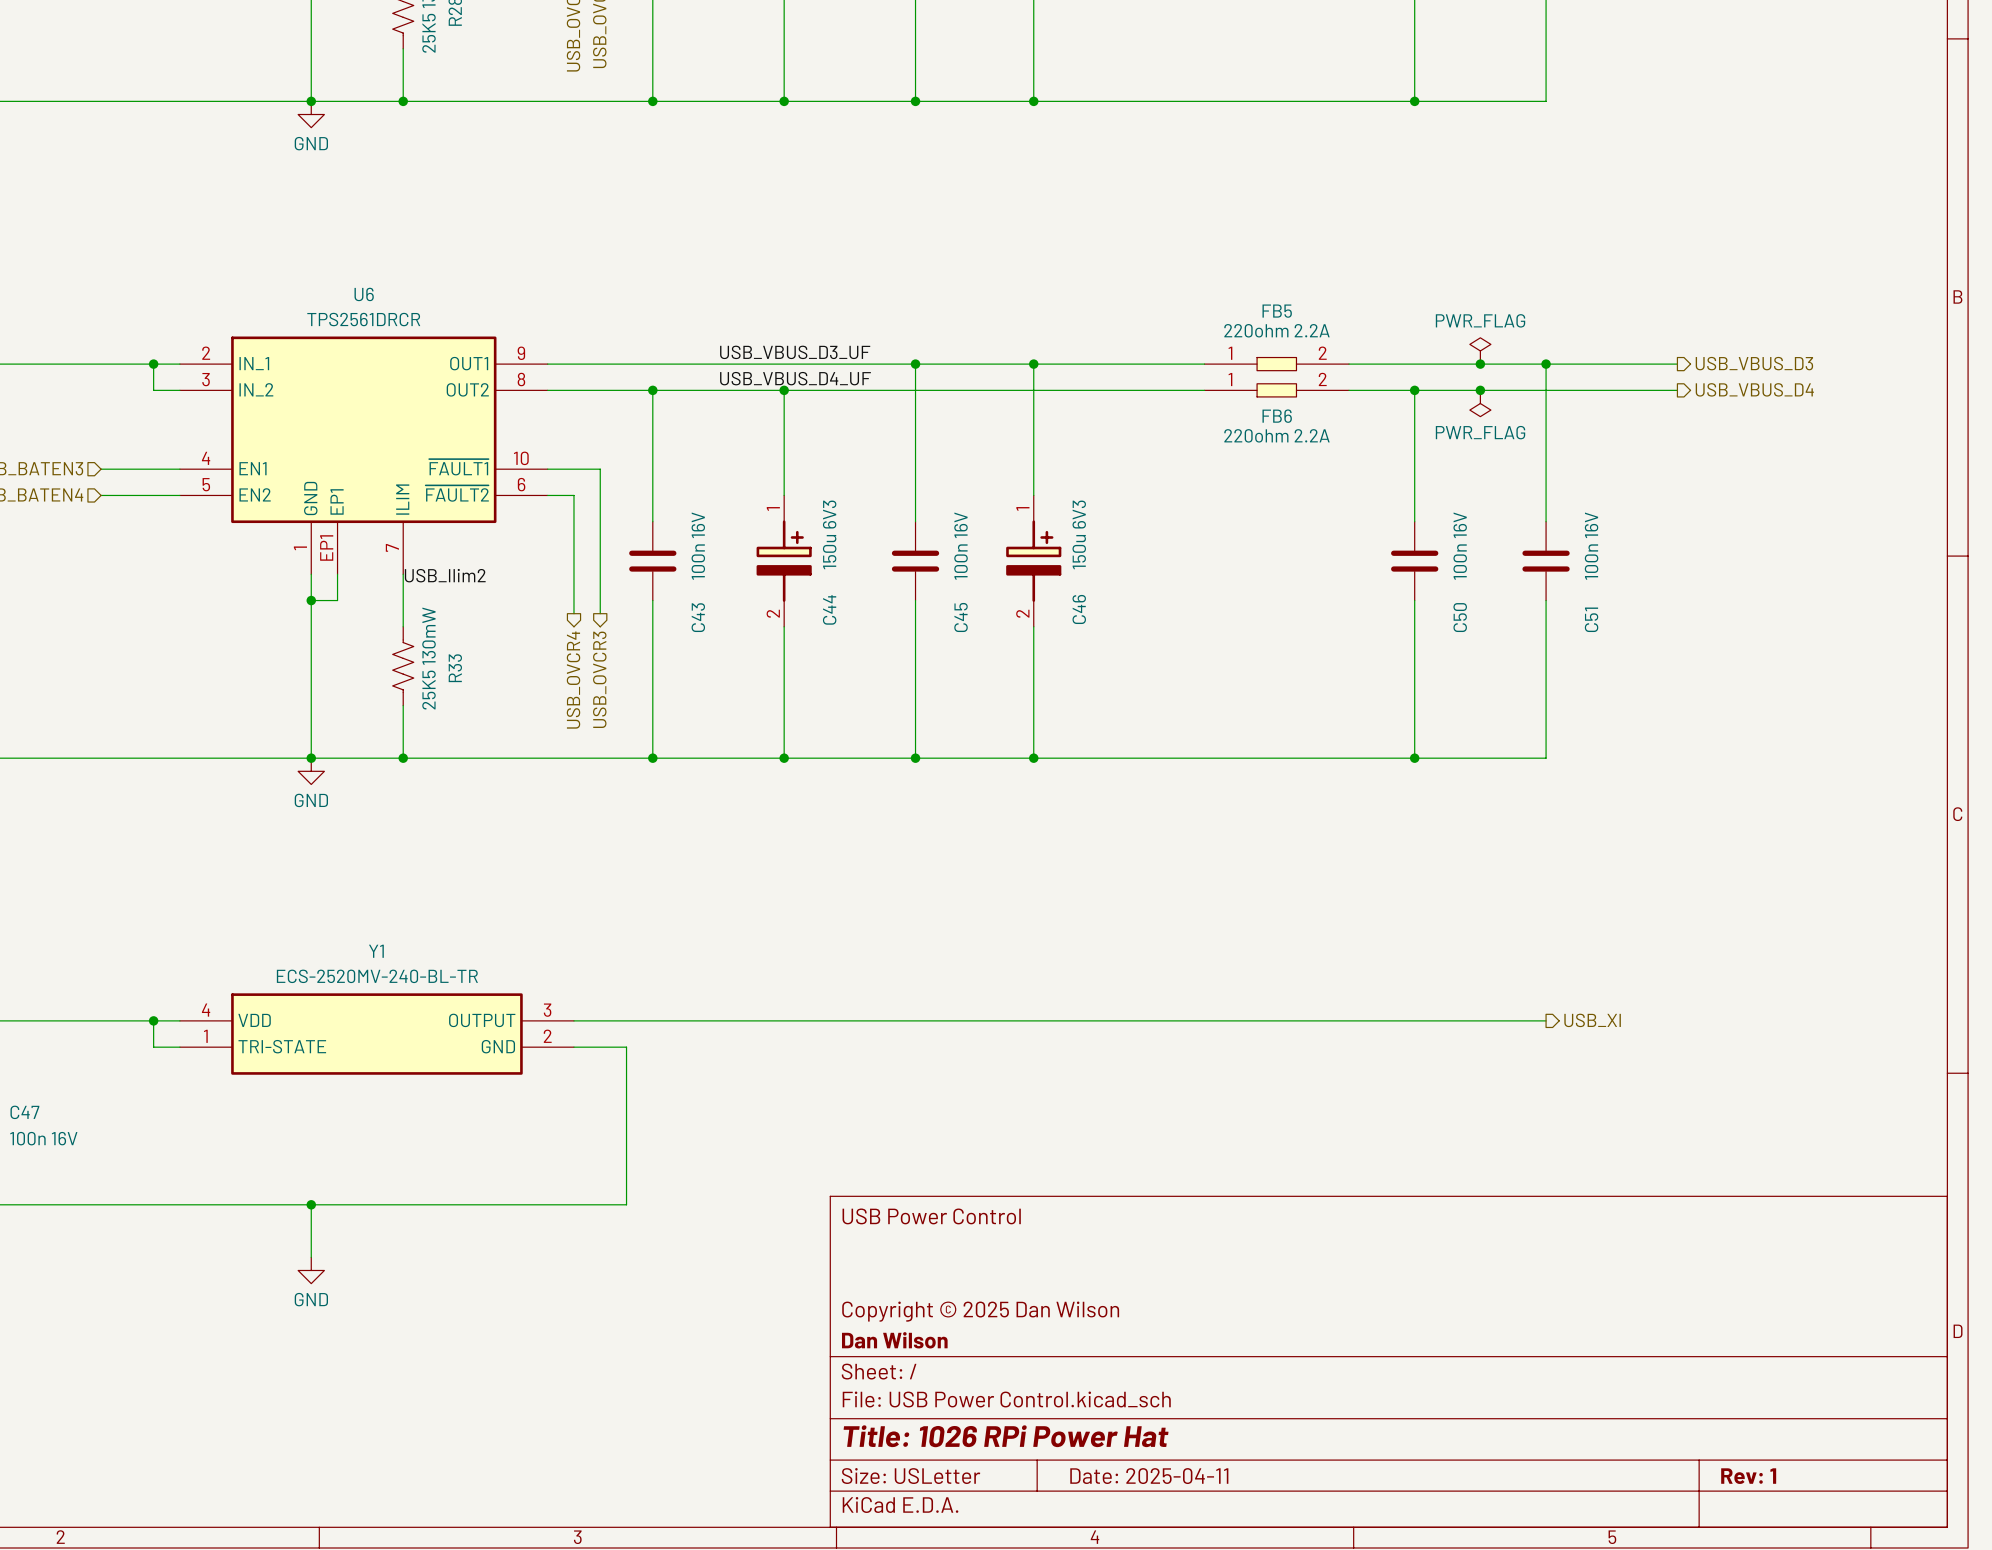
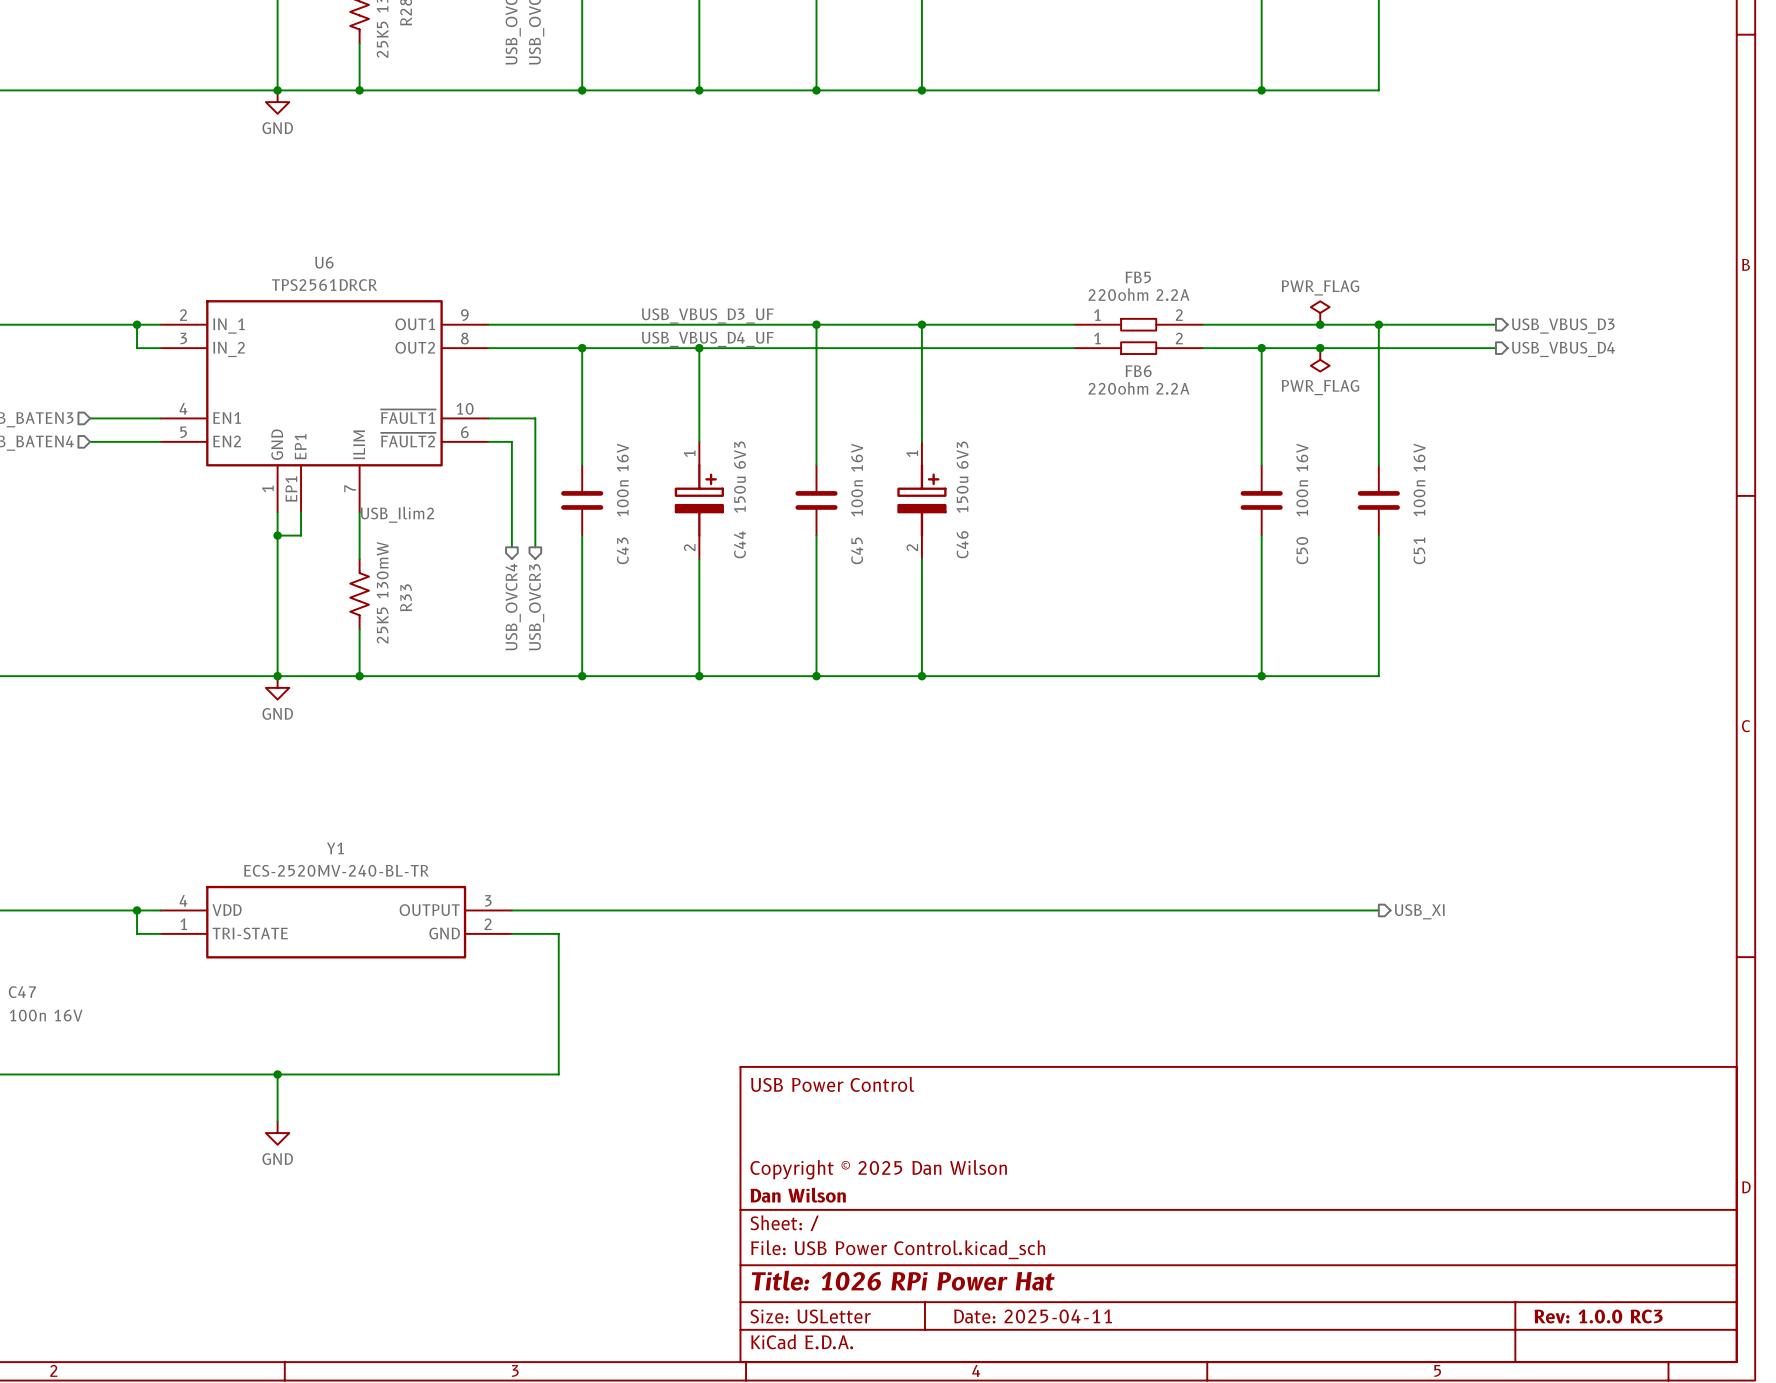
title block: Rev: 1 (1748, 1476) -> Rev: 1.0.0 RC3 (1598, 1316)

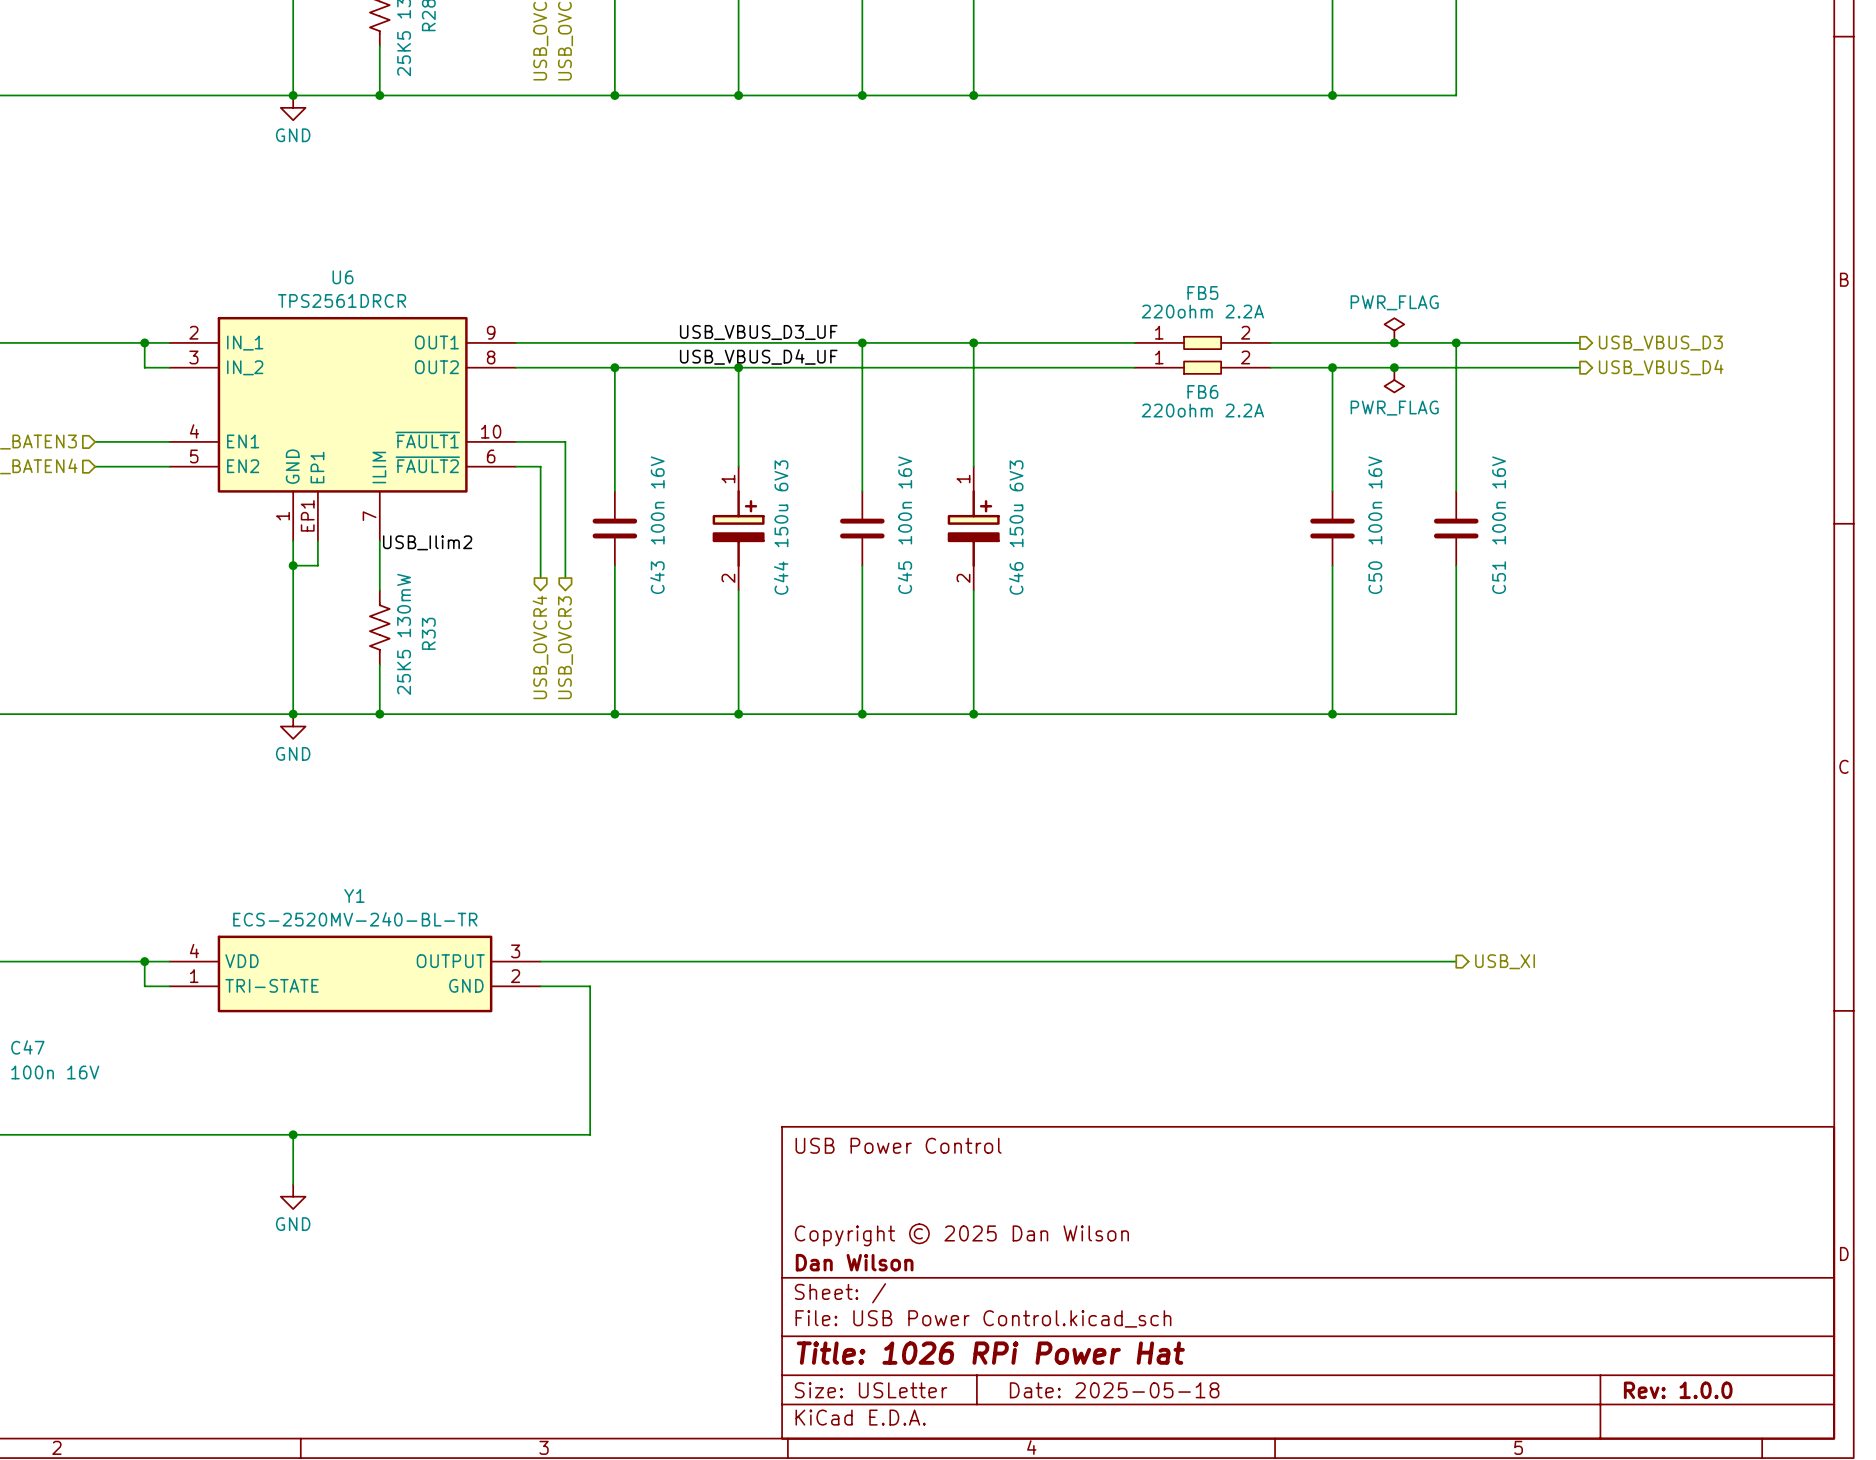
title block: Date: 2025-04-11 (1033, 1316) -> Date: 2025-05-18 (1114, 1390)
title block: Rev: 1.0.0 RC3 (1598, 1316) -> Rev: 1.0.0 (1678, 1390)

